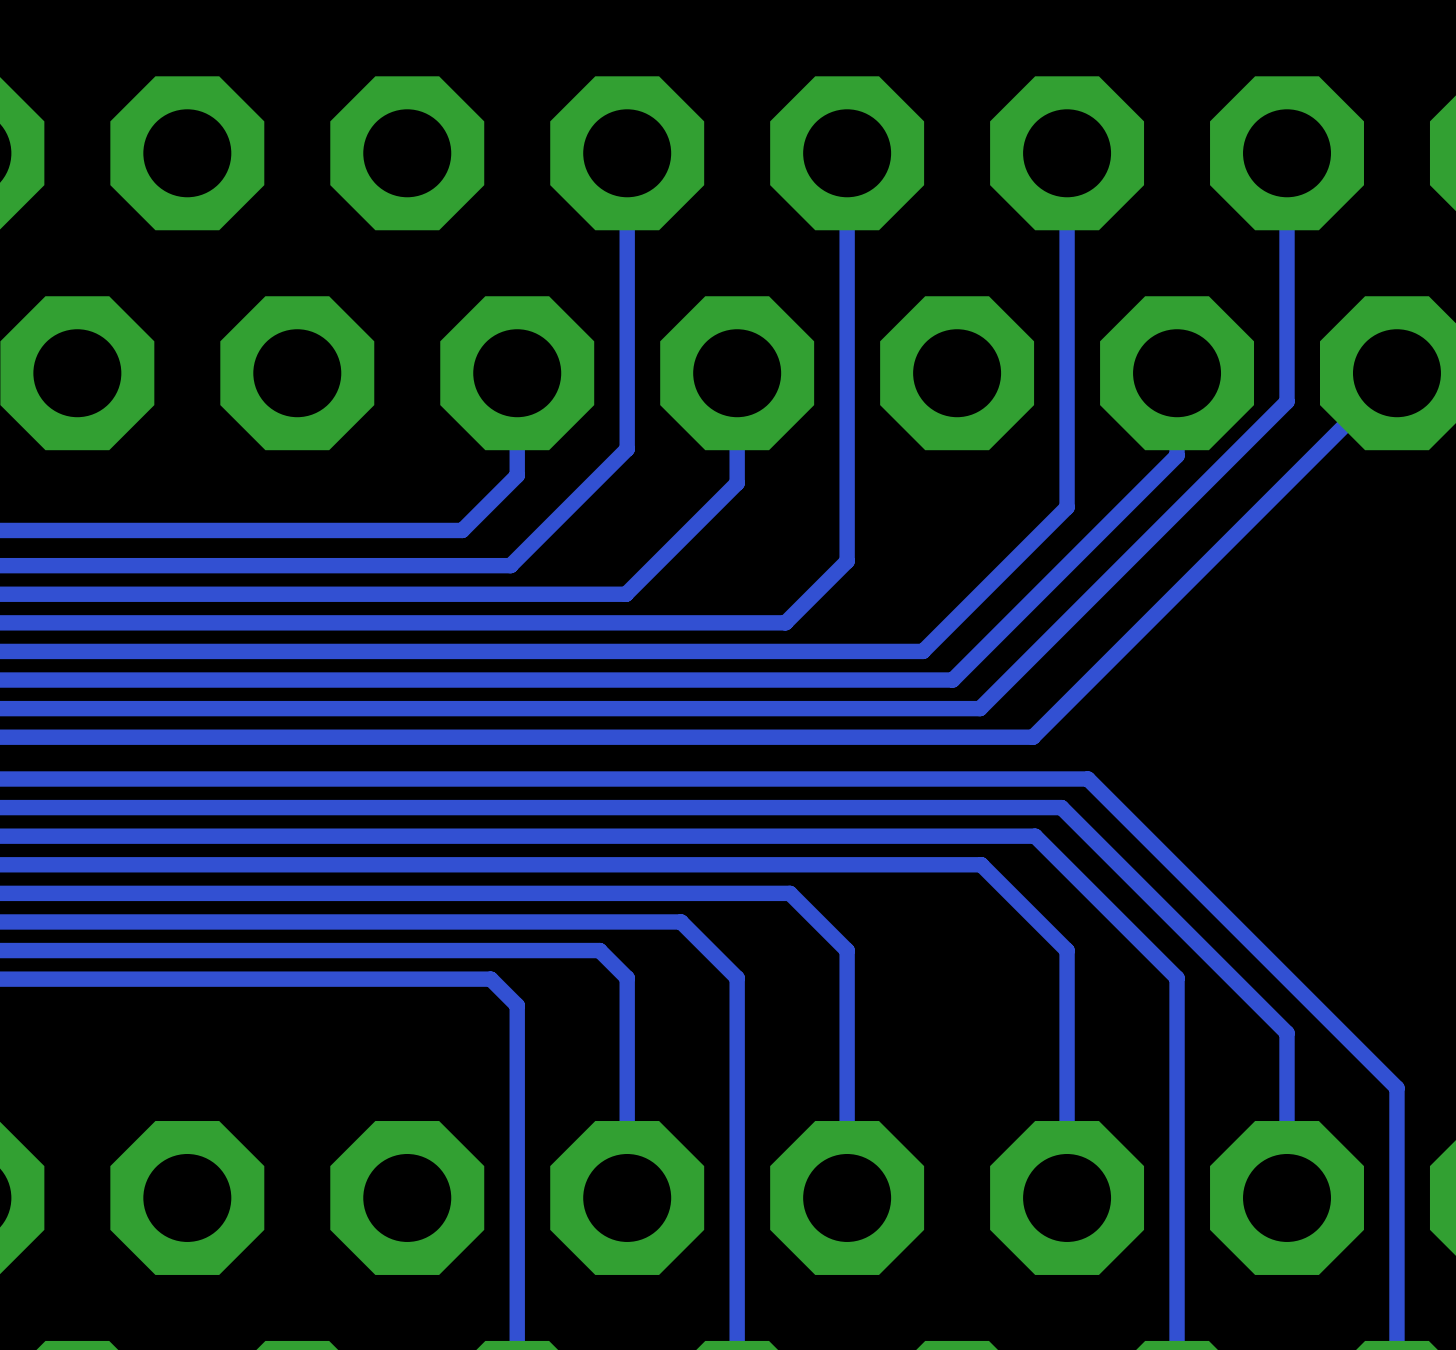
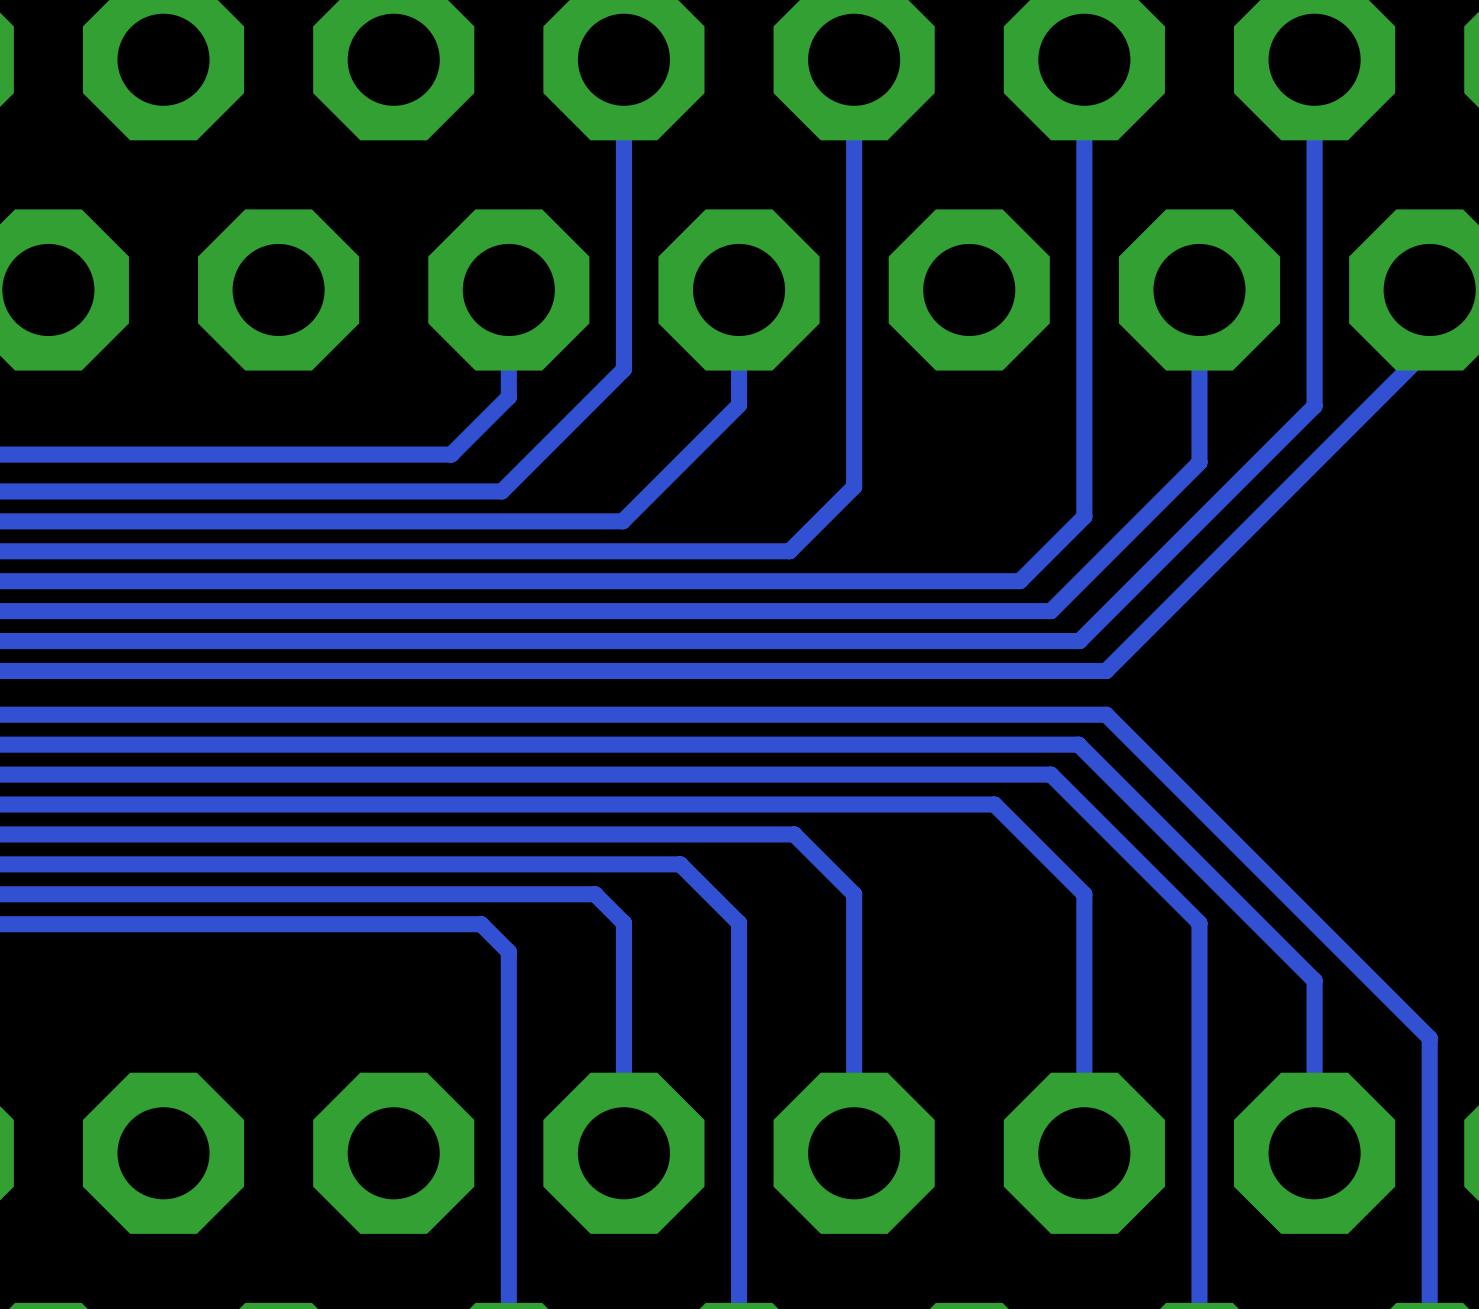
track: (1396, 373) (1032, 737) -> (1429, 289) (1429, 347) (1106, 670) (1048, 670)
track: (1287, 401) (980, 708) -> (1314, 319) (1314, 406) (1079, 641) (993, 641)
track: (1177, 455) (952, 680) -> (1199, 376) (1199, 462) (1050, 611) (964, 611)
track: (1067, 507) (923, 651) -> (1084, 430) (1084, 516) (1019, 581) (933, 581)

